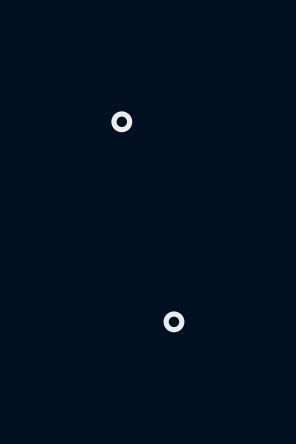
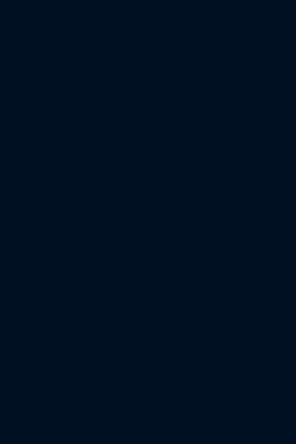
via: (121, 121) -> none
via: (173, 321) -> none

